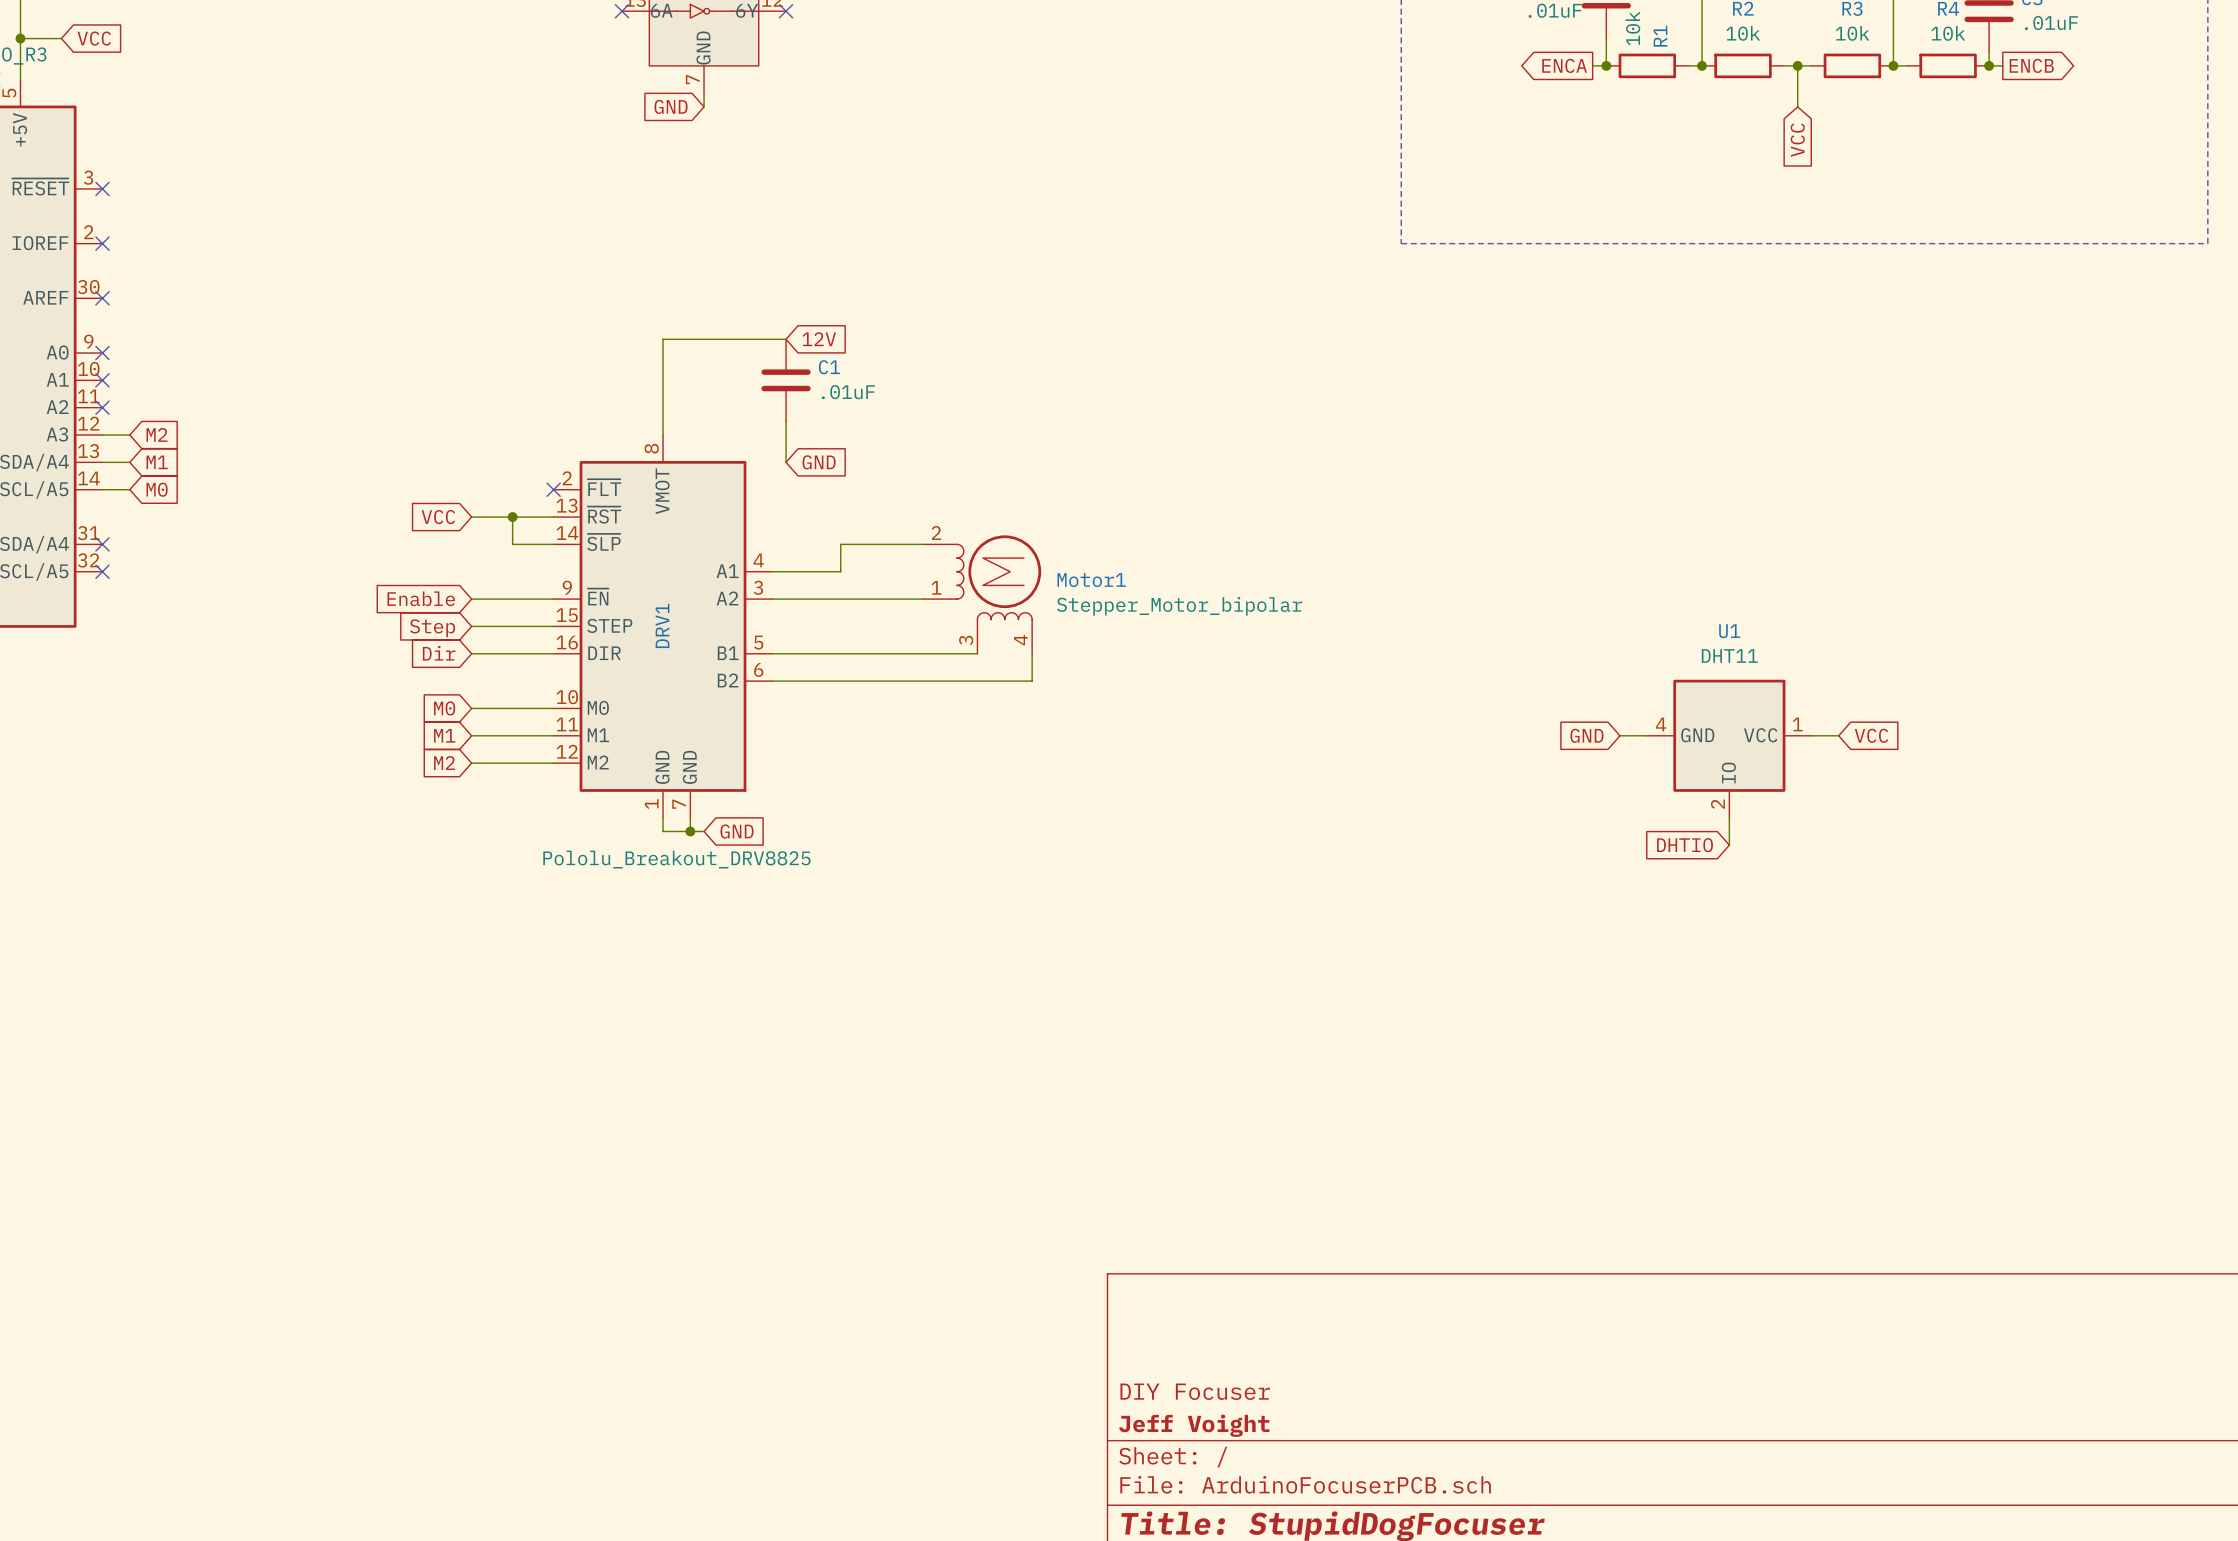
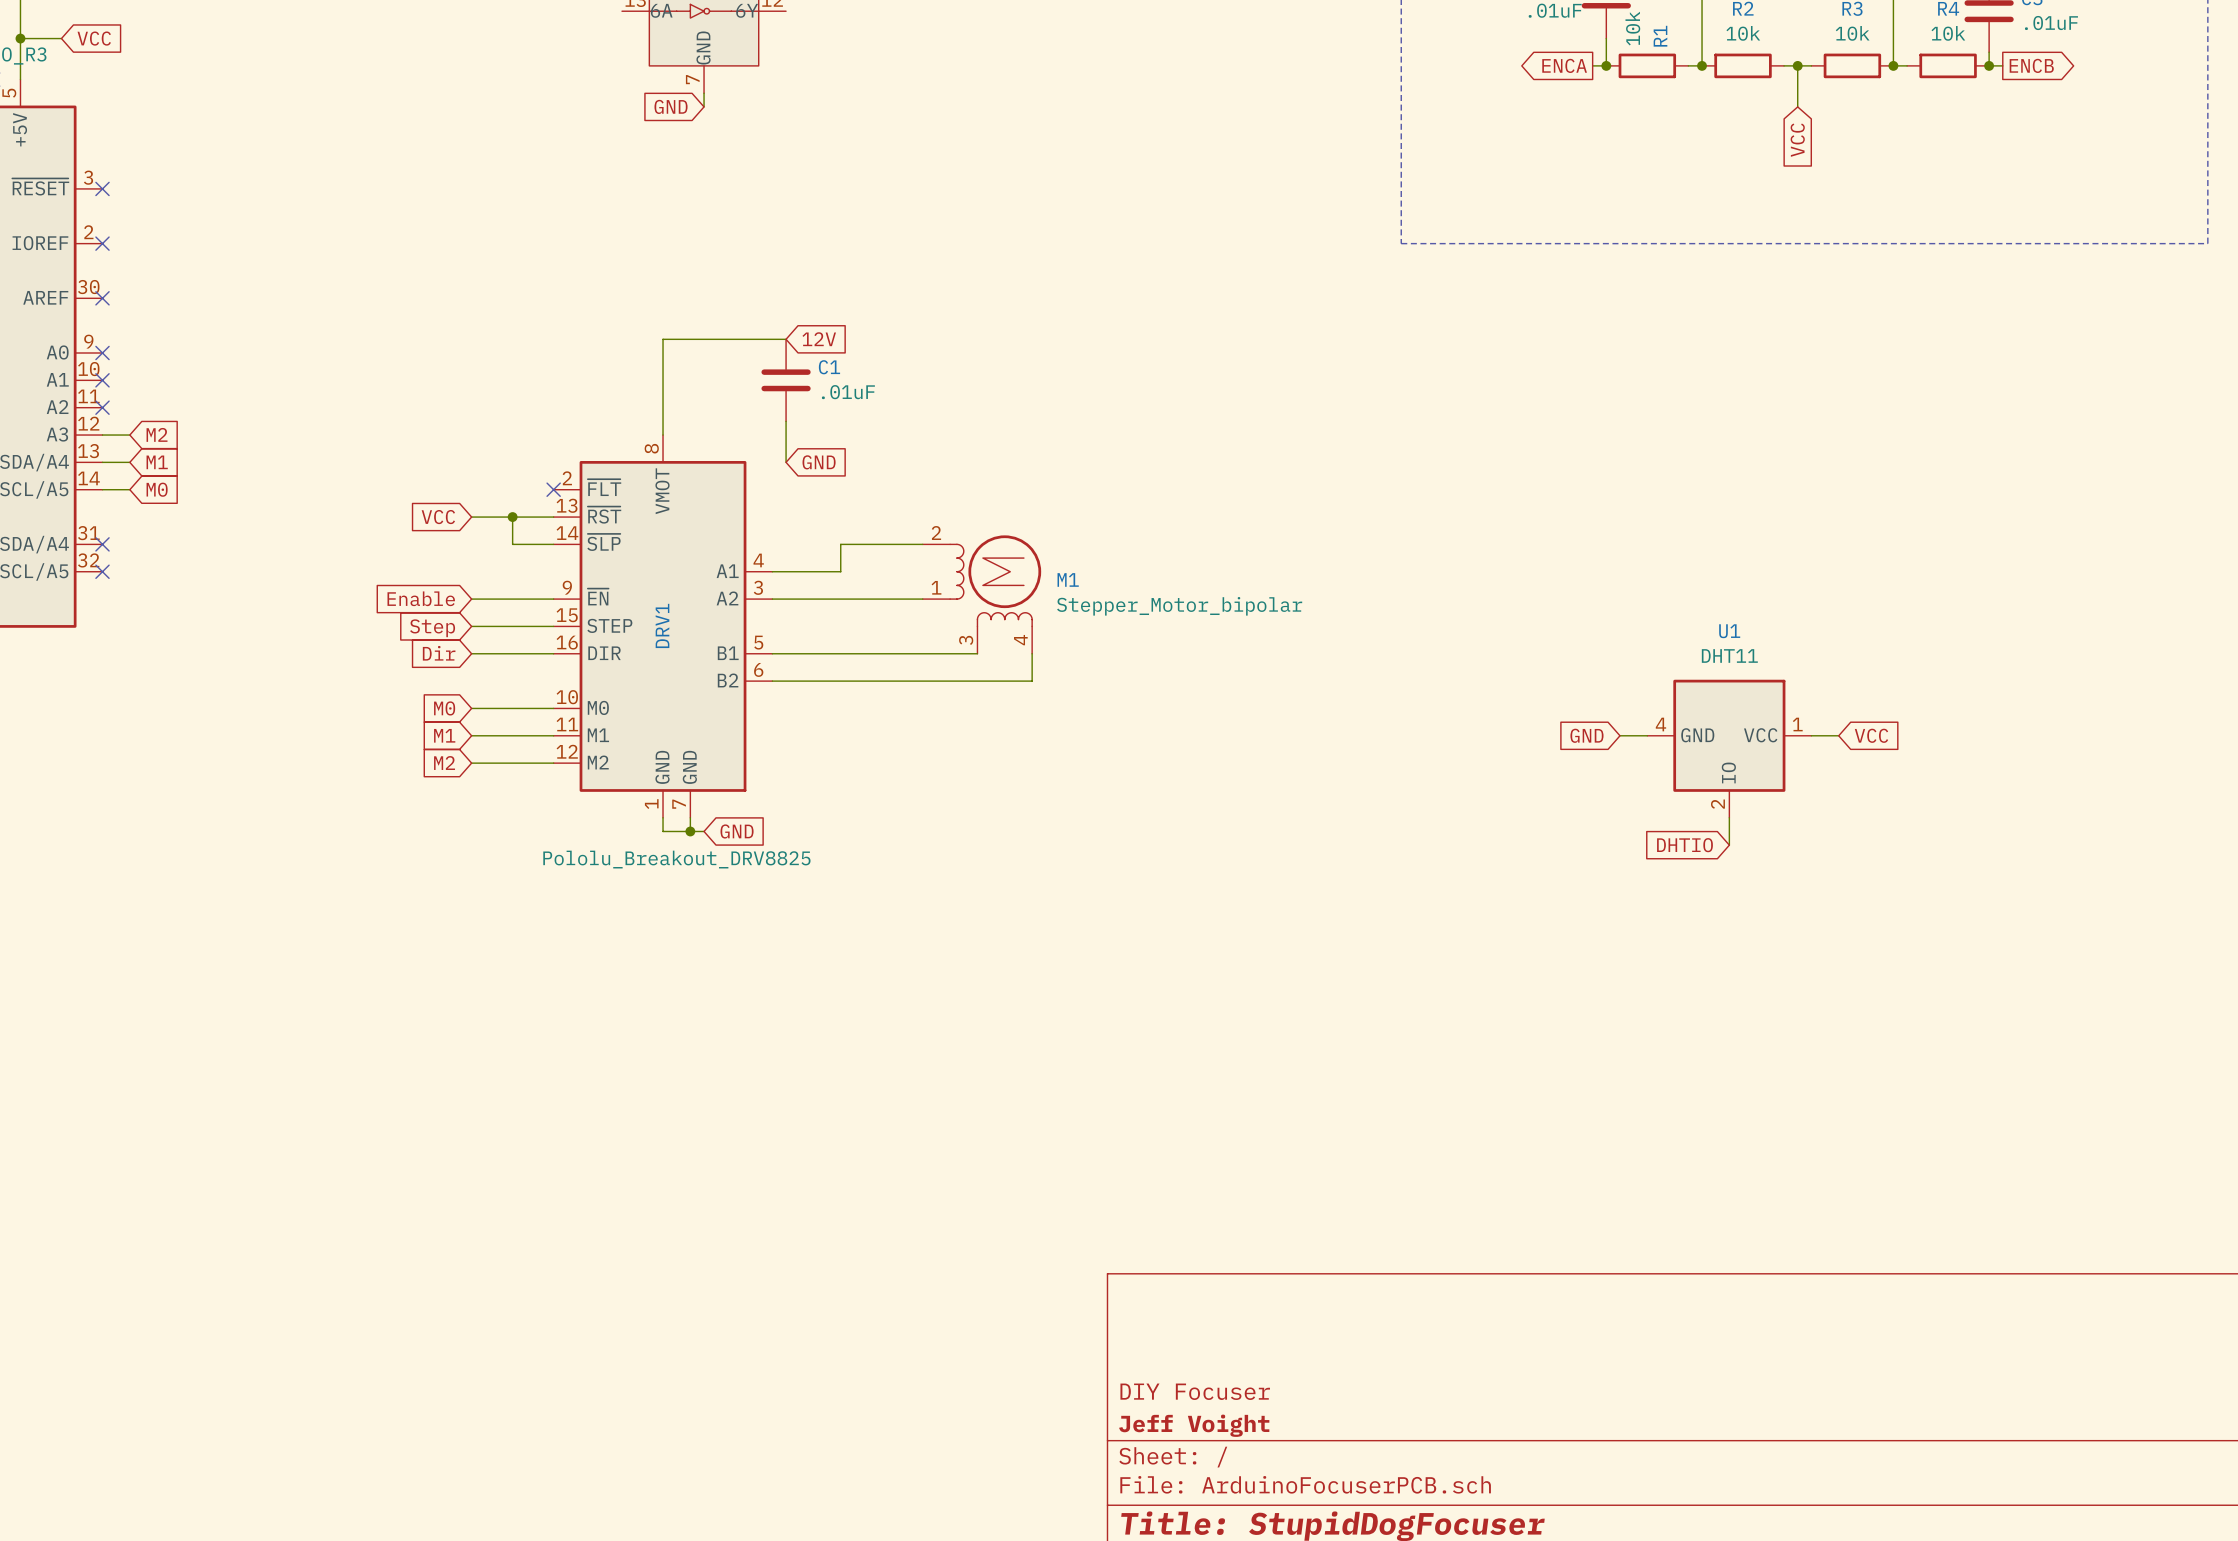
no-connect mark: (622, 11) -> none
no-connect mark: (786, 11) -> none
Motor1 name: Motor1 (1091, 580) -> M1 (1068, 579)

